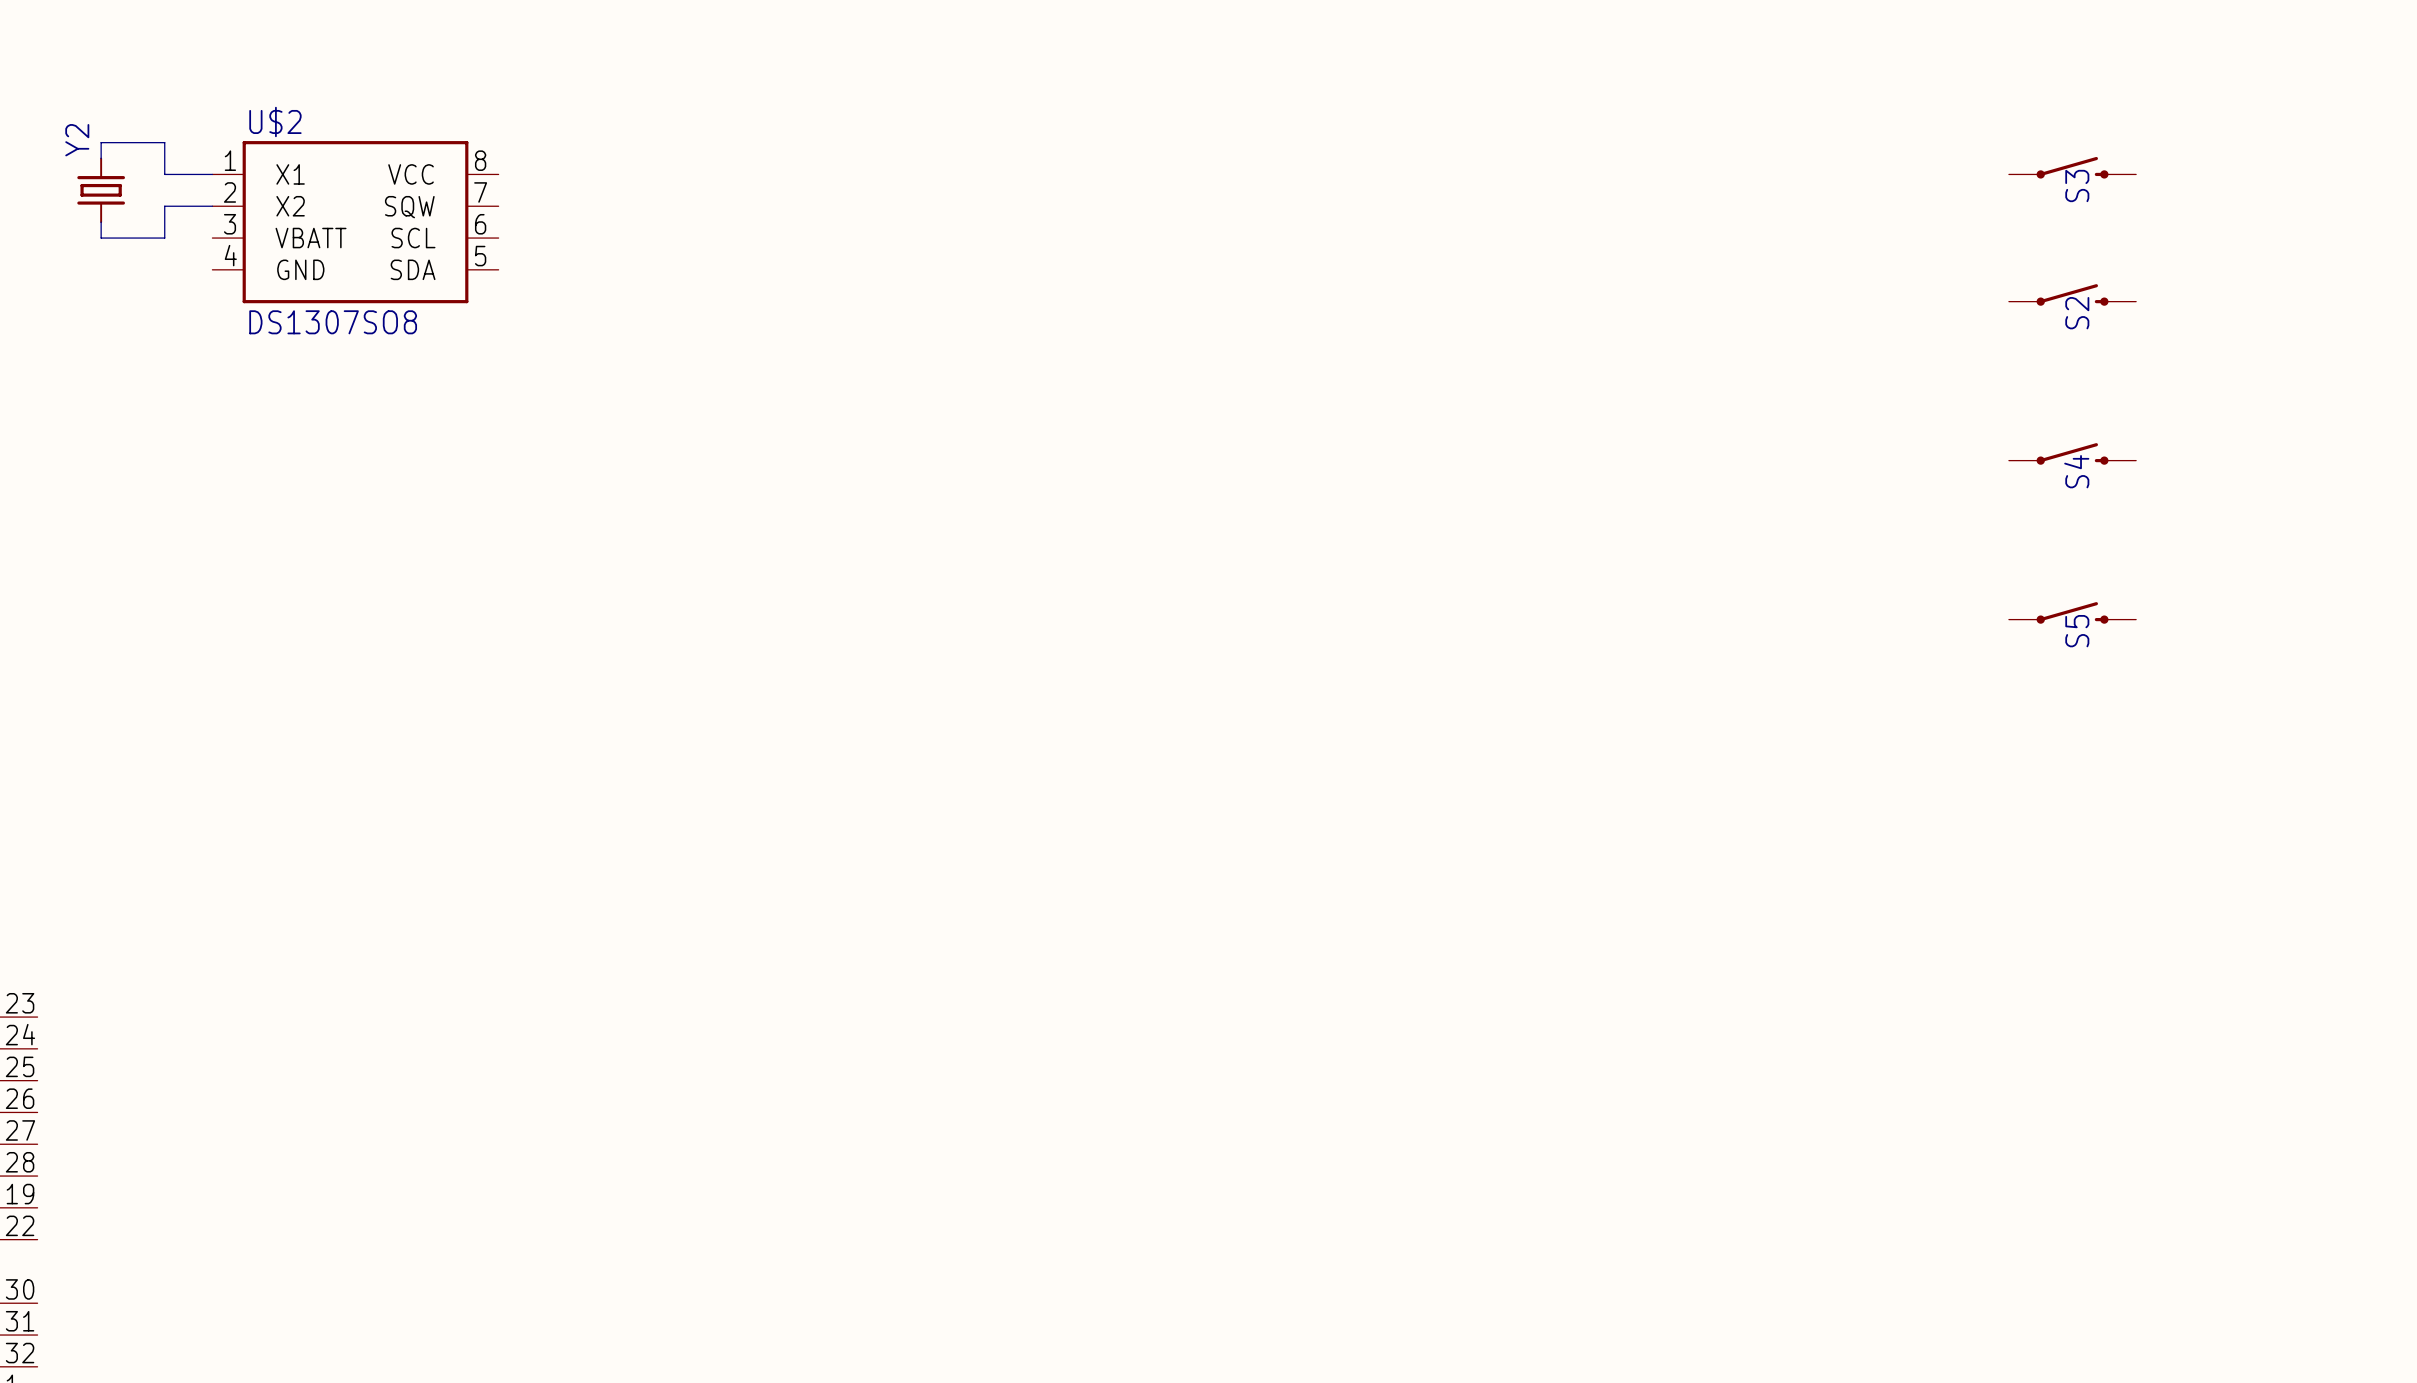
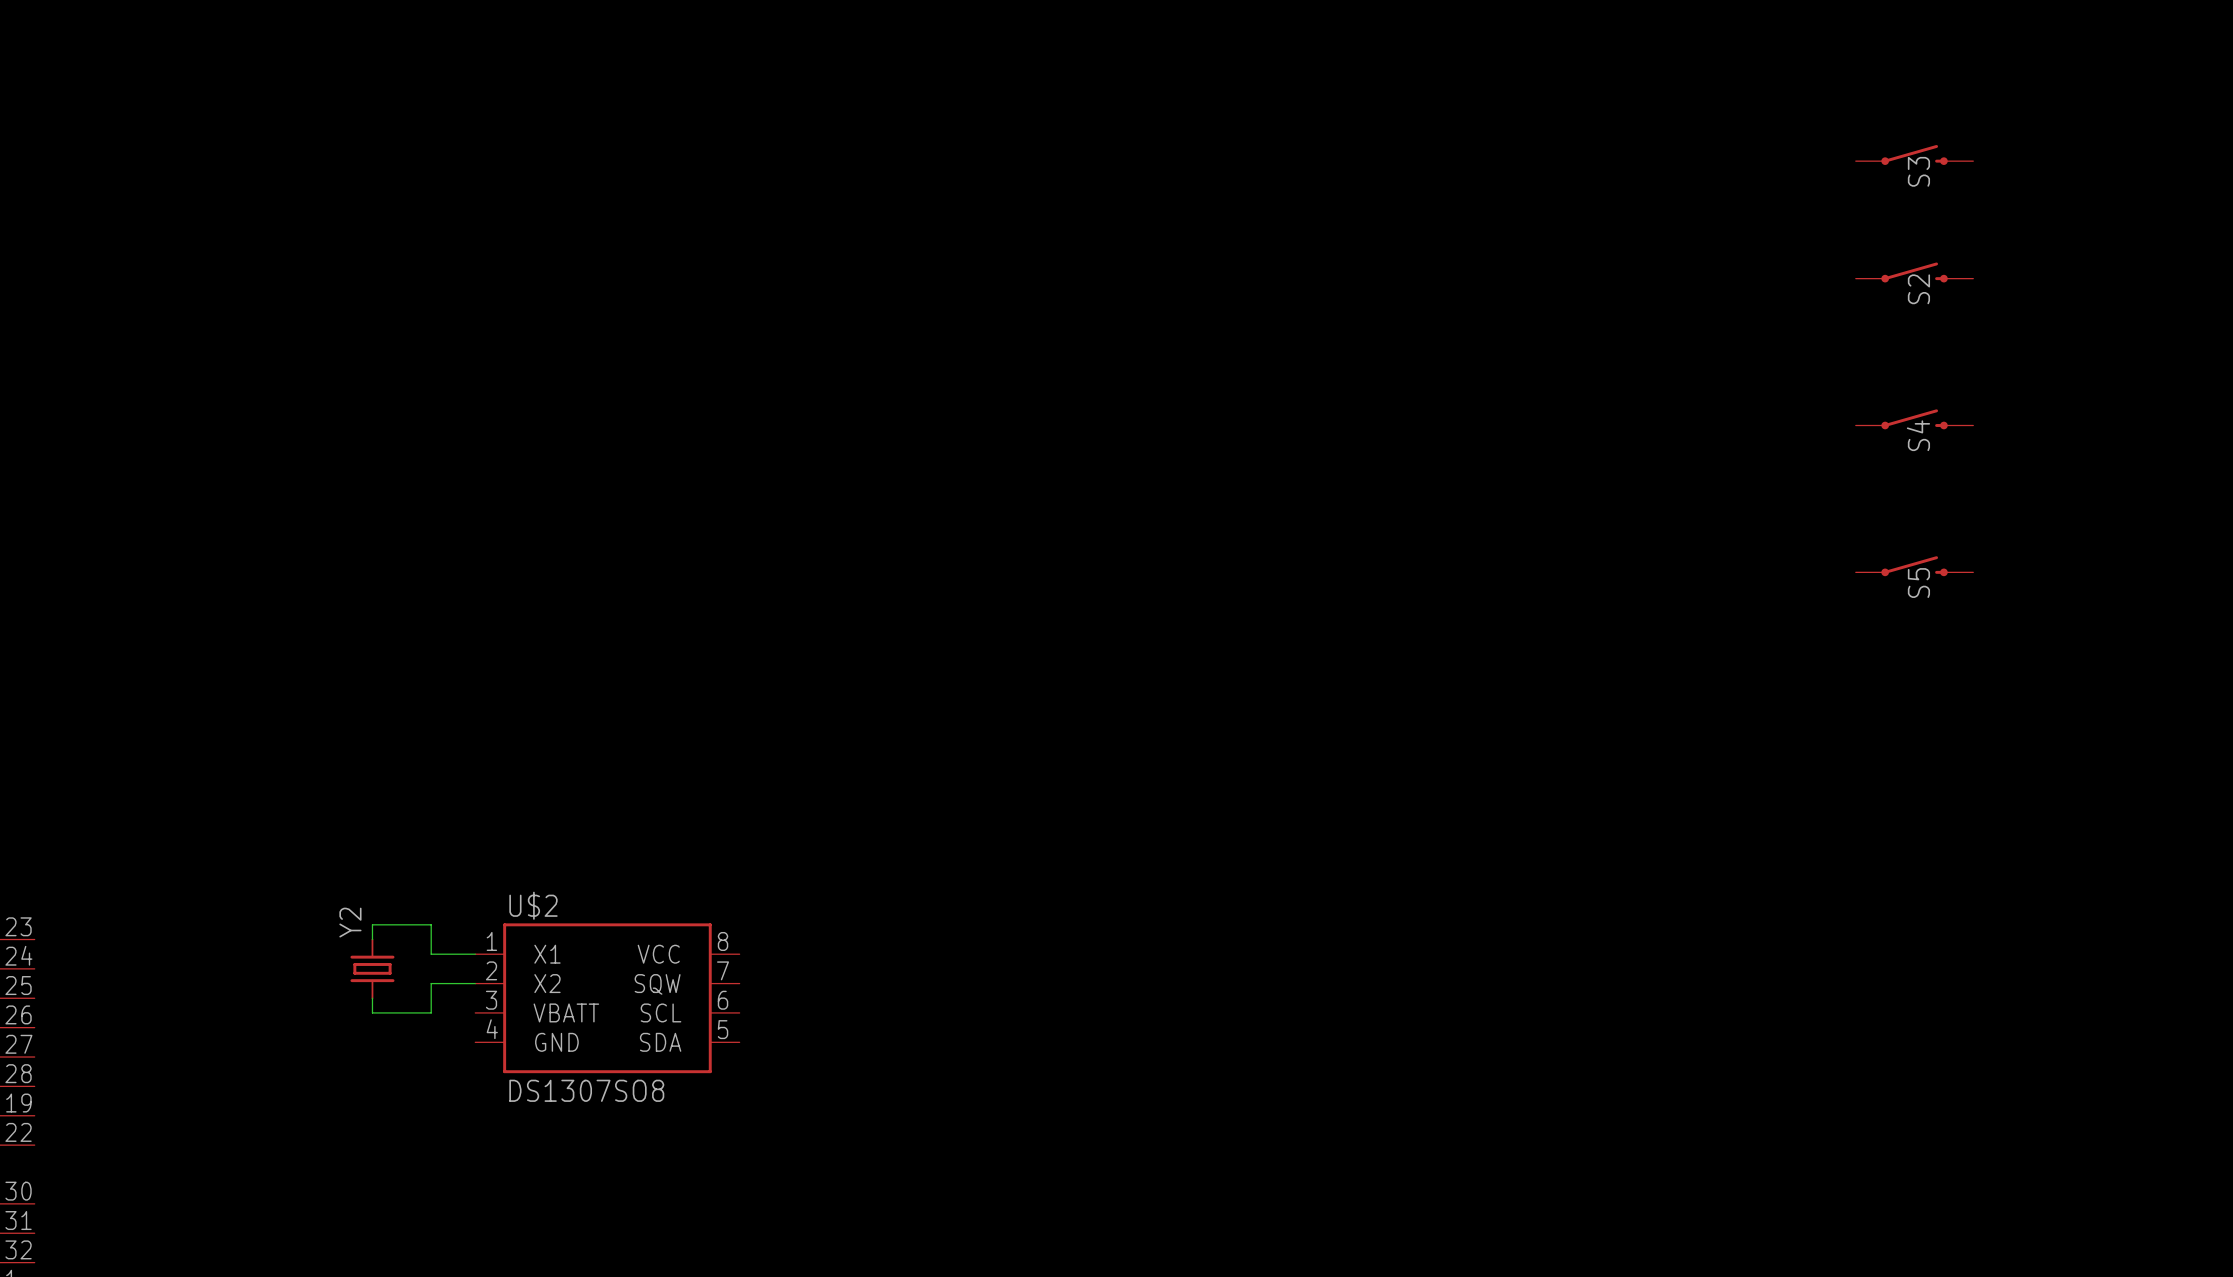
wire: (101, 158) (101, 142) (164, 142) (164, 174) (212, 174) -> none
Y2 position: (101, 190) -> (372, 968)
wire: (212, 206) (164, 206) (164, 238) (101, 238) (101, 222) -> none
U$2 position: (355, 222) -> (607, 998)
wire: none -> (372, 939) (372, 924) (431, 924) (431, 954) (475, 954)
wire: none -> (475, 983) (431, 983) (431, 1012) (372, 1012) (372, 998)

